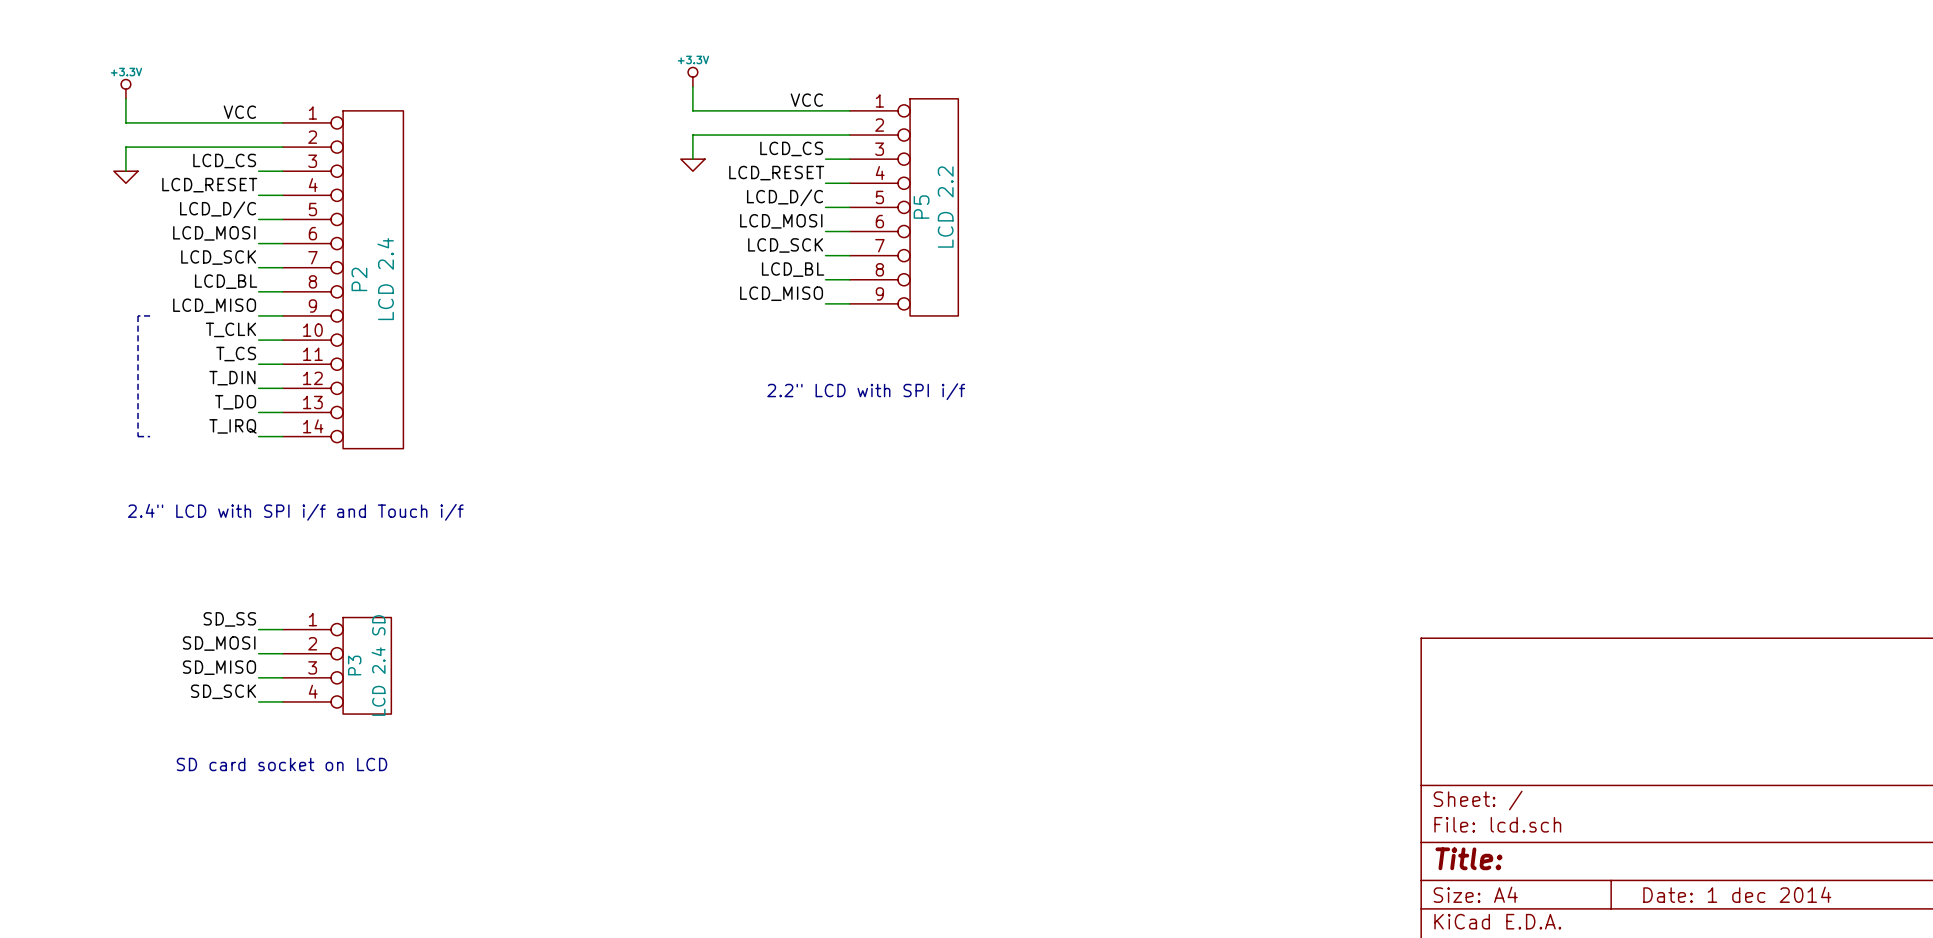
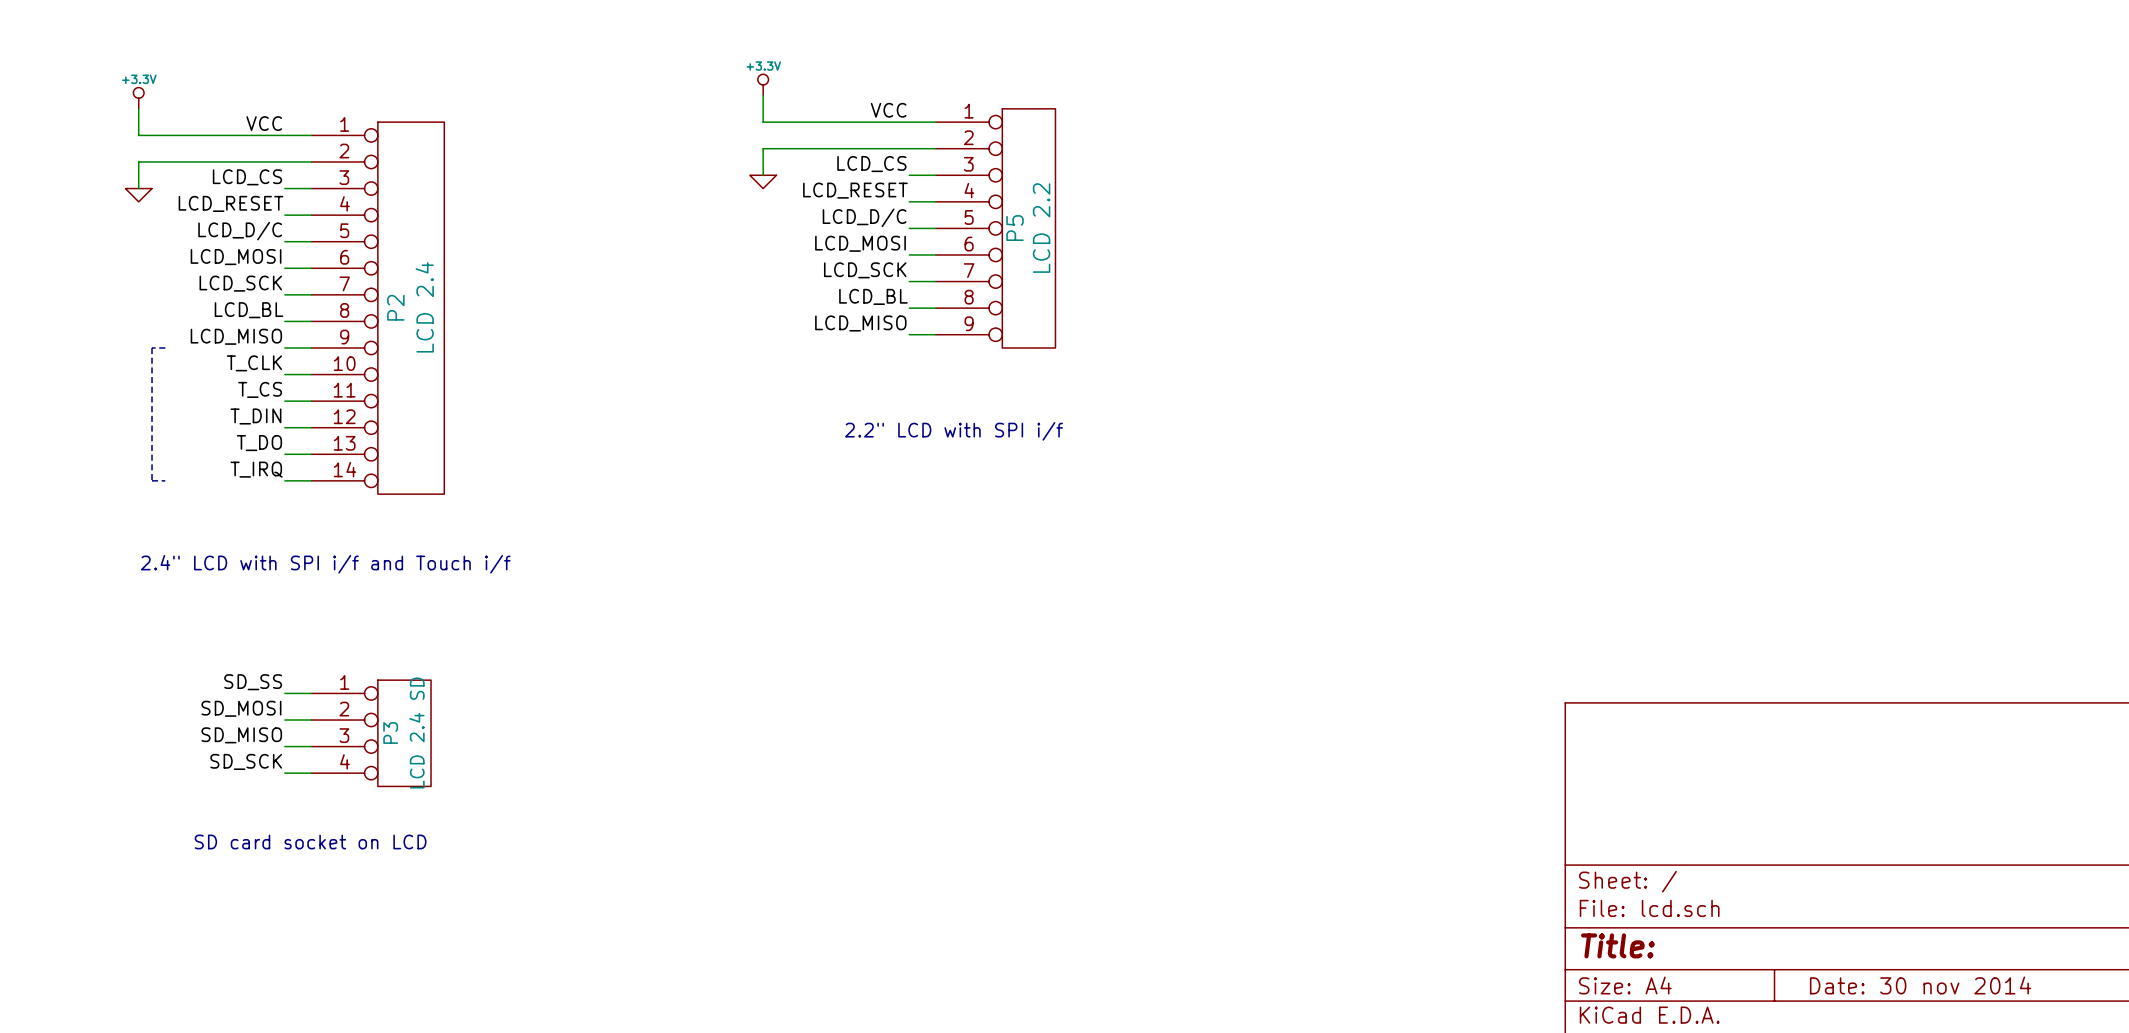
title block: Date: 1 dec 2014 (1737, 894) -> Date: 30 nov 2014 (1920, 985)

